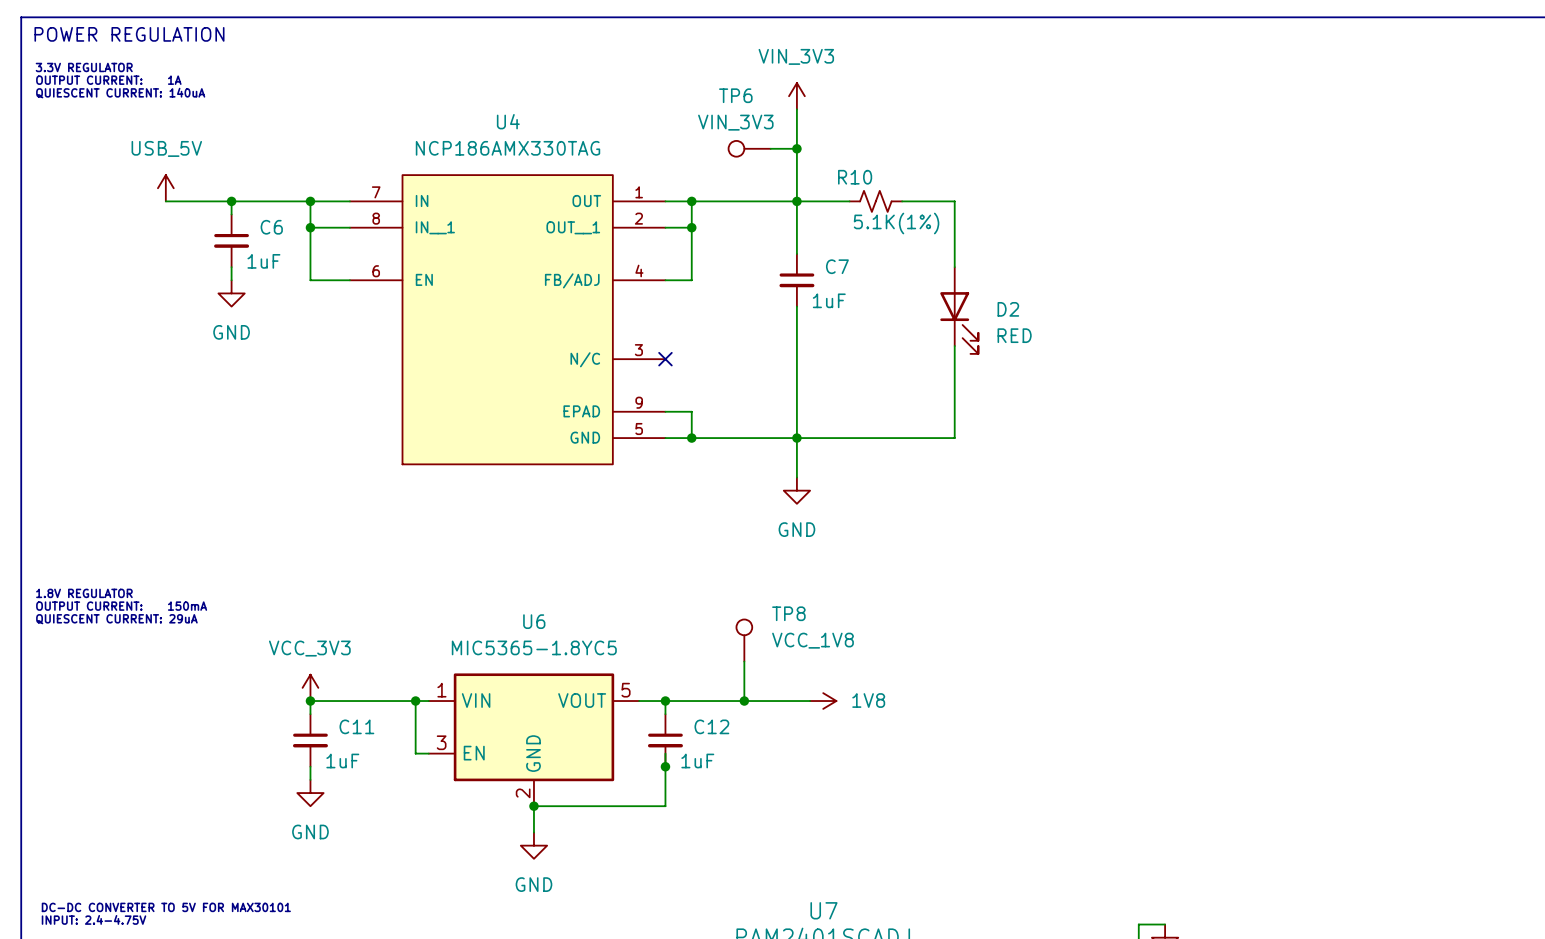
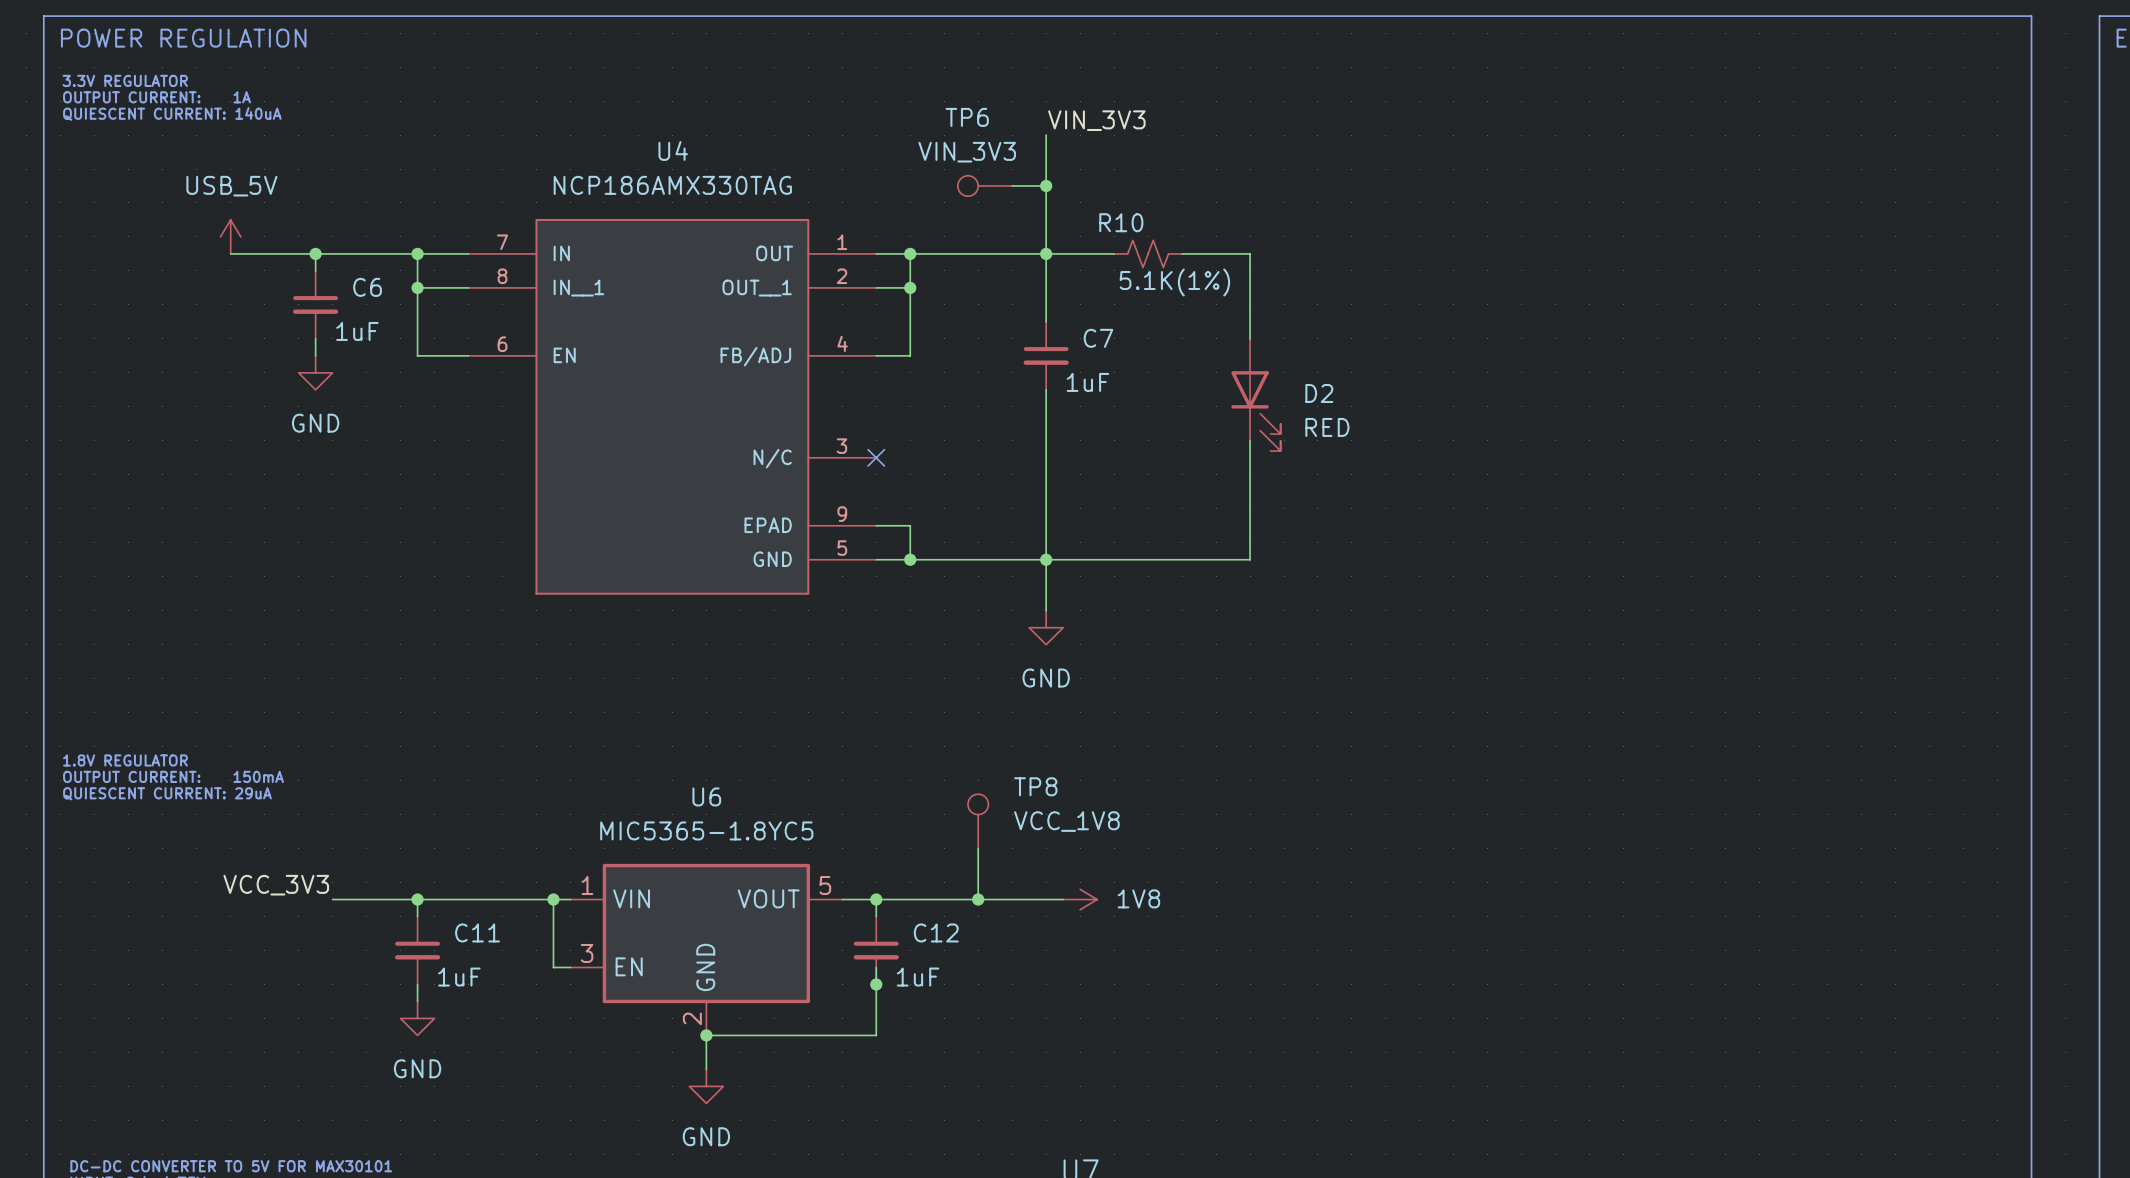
power symbol: VIN_3V3 (796, 96) -> none
label: none -> VIN_3V3 (1096, 120)
power symbol: VCC_3V3 (310, 687) -> none
label: none -> VCC_3V3 (276, 885)
wire: none -> (332, 899) (417, 899)

